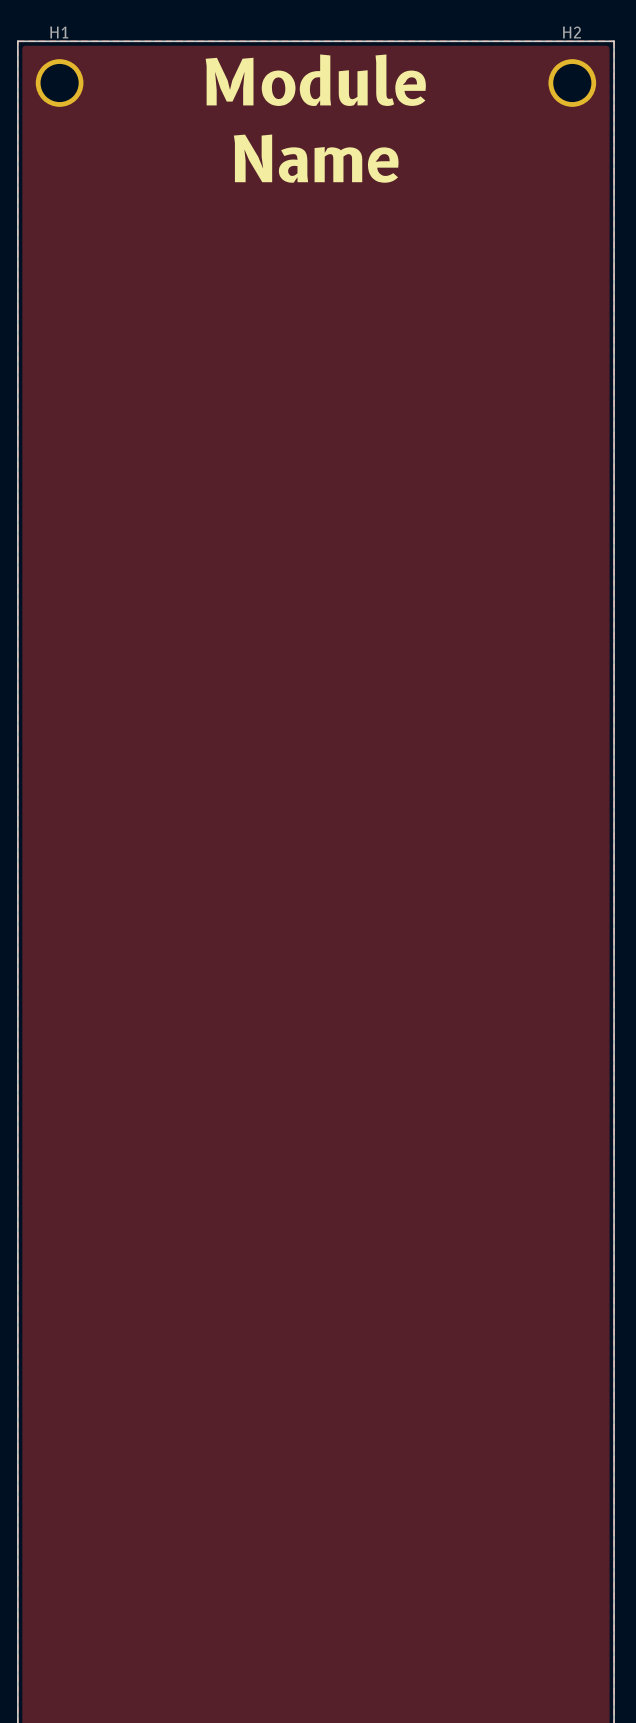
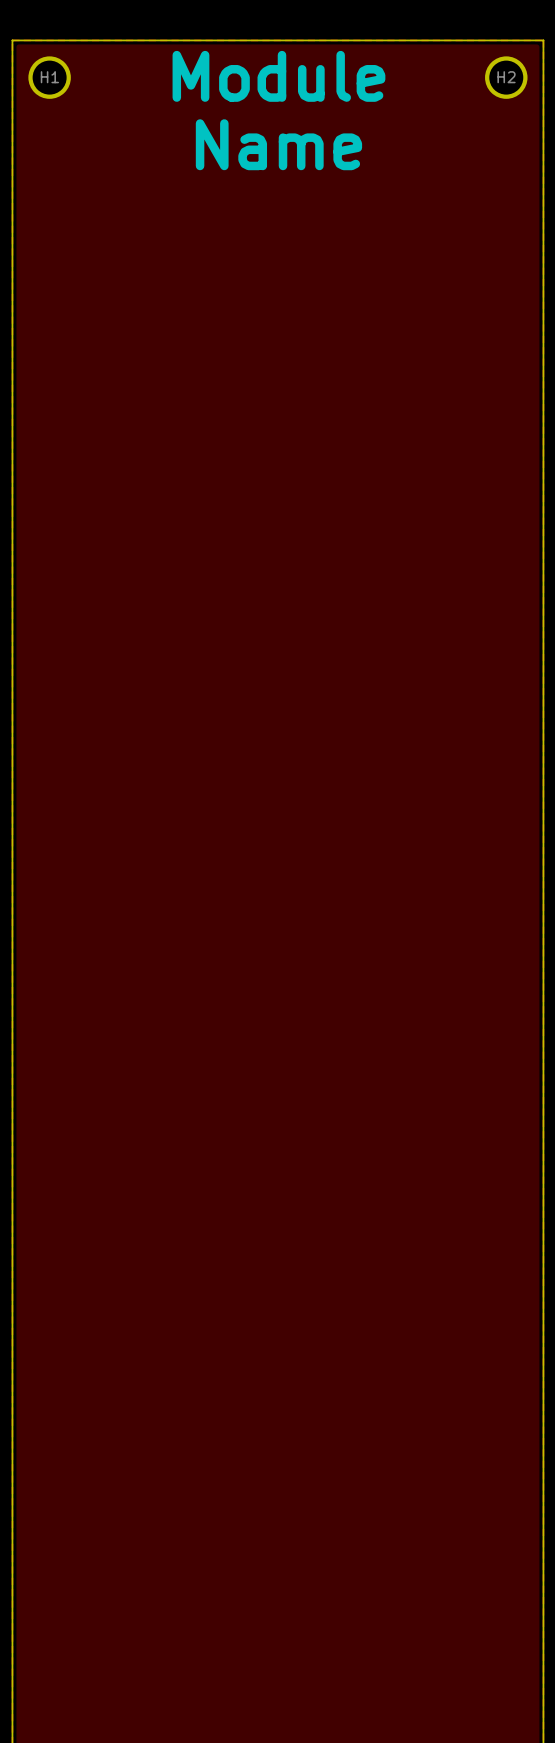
H1 name position: H1 (59, 32) -> H1 (49, 77)
H2 name position: H2 (571, 32) -> H2 (506, 77)

